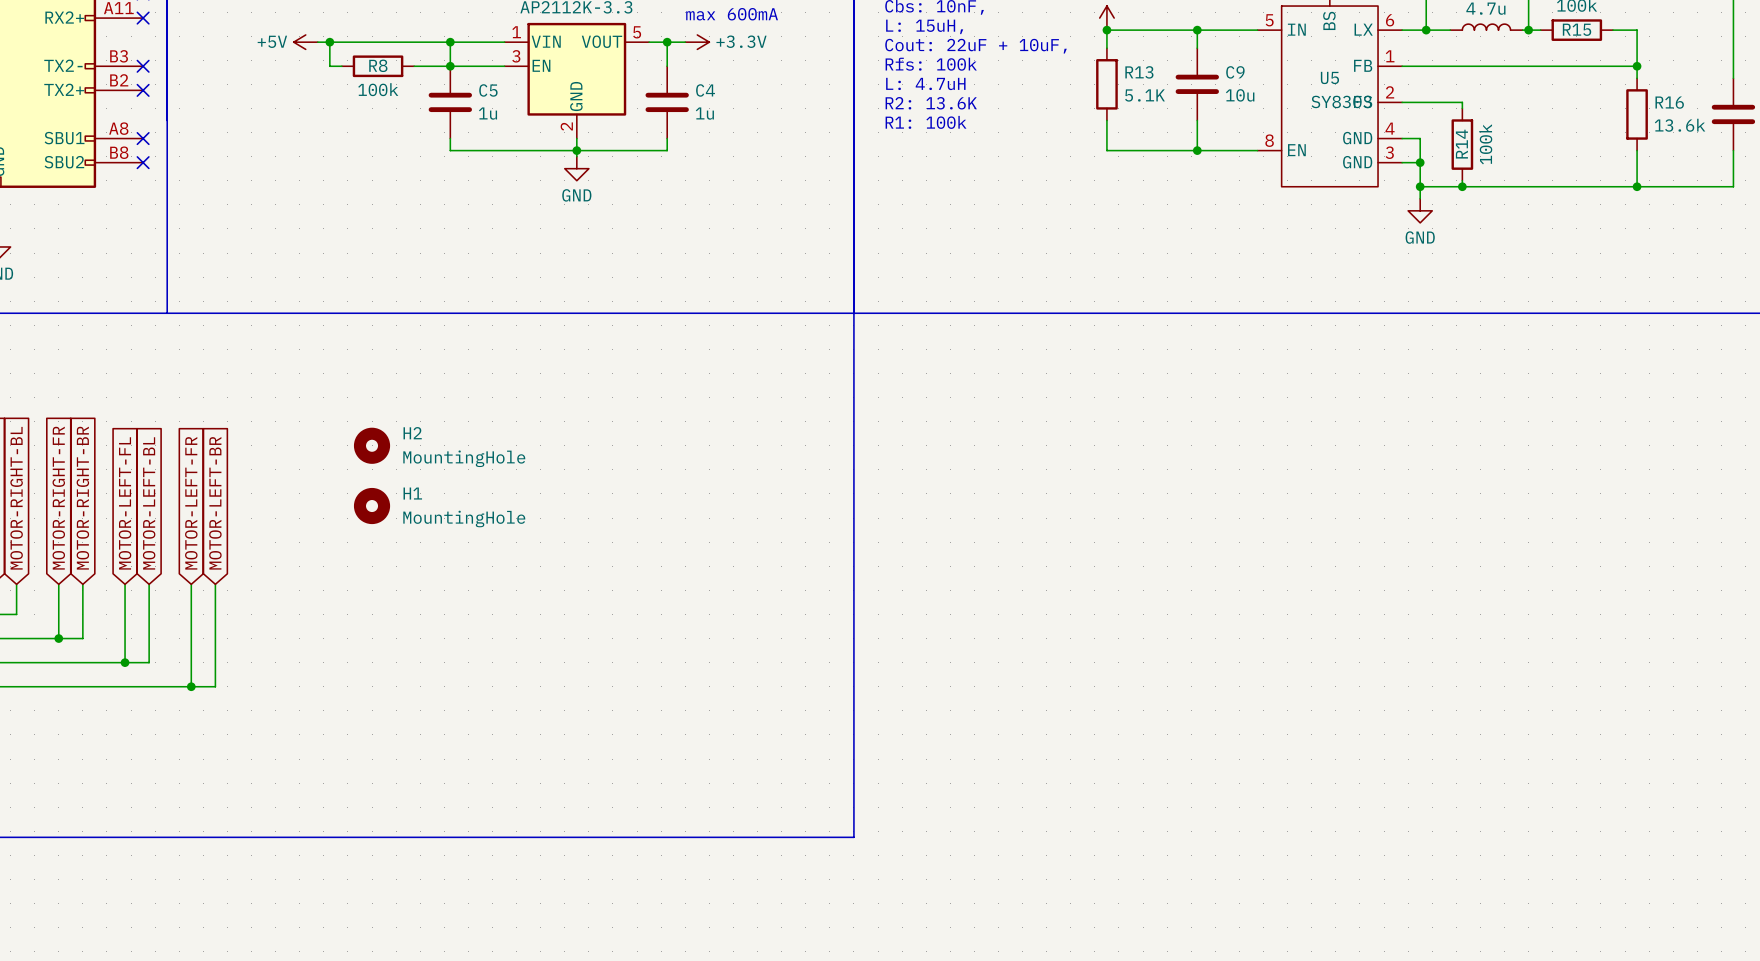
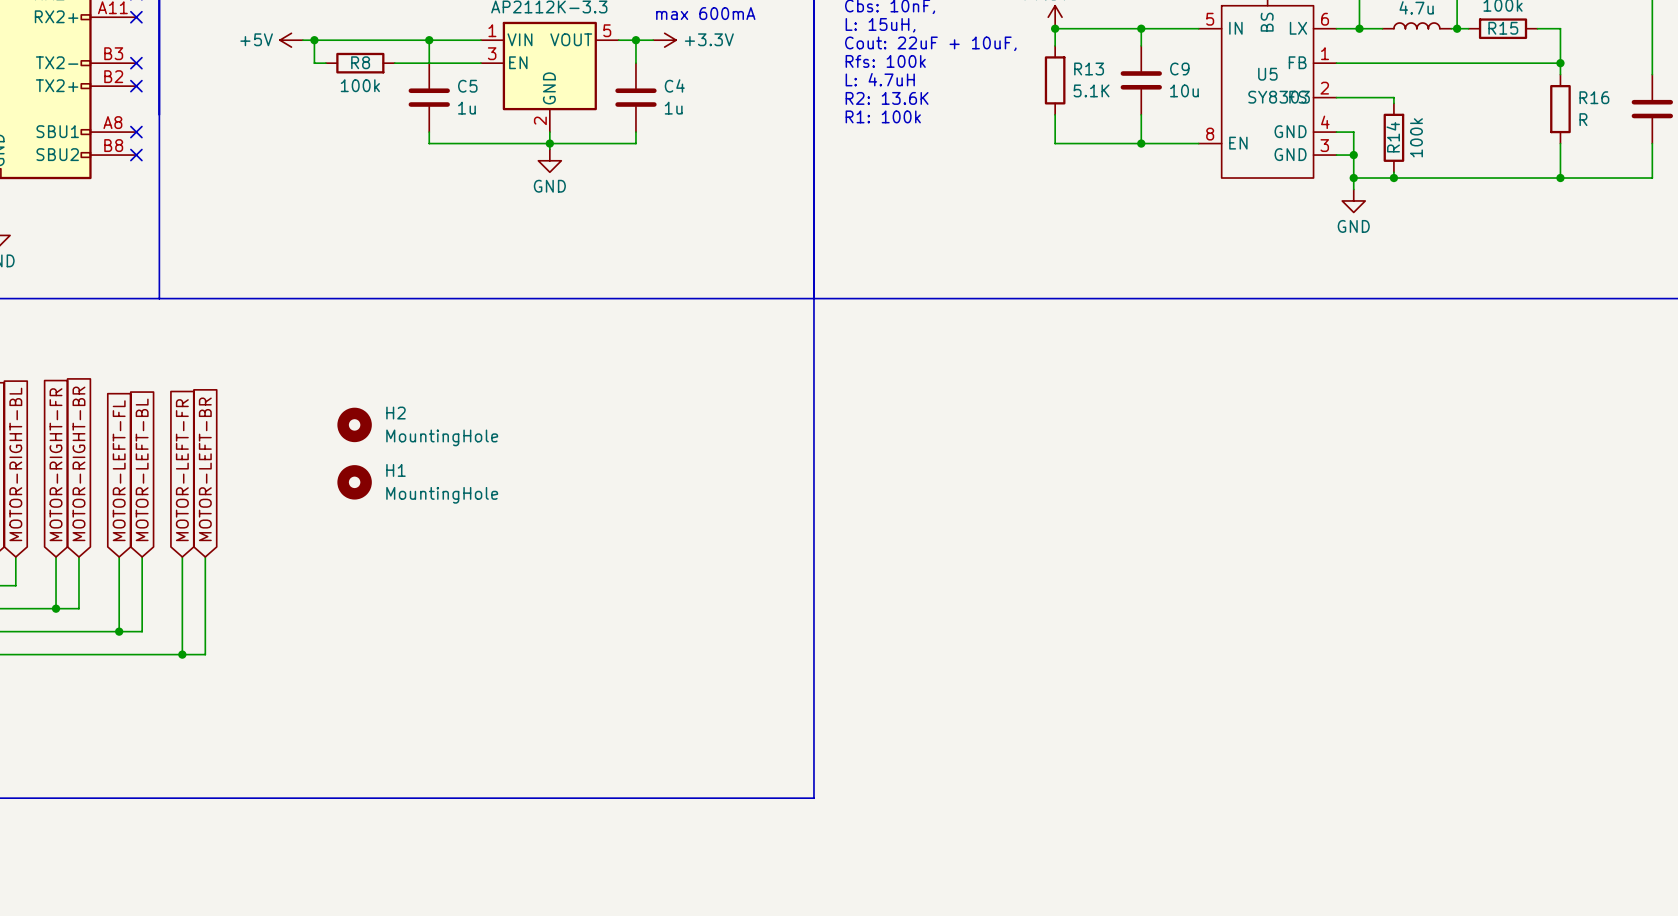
junction: (450, 66) -> none
R16 value: 13.6k (1680, 125) -> R (1583, 119)

